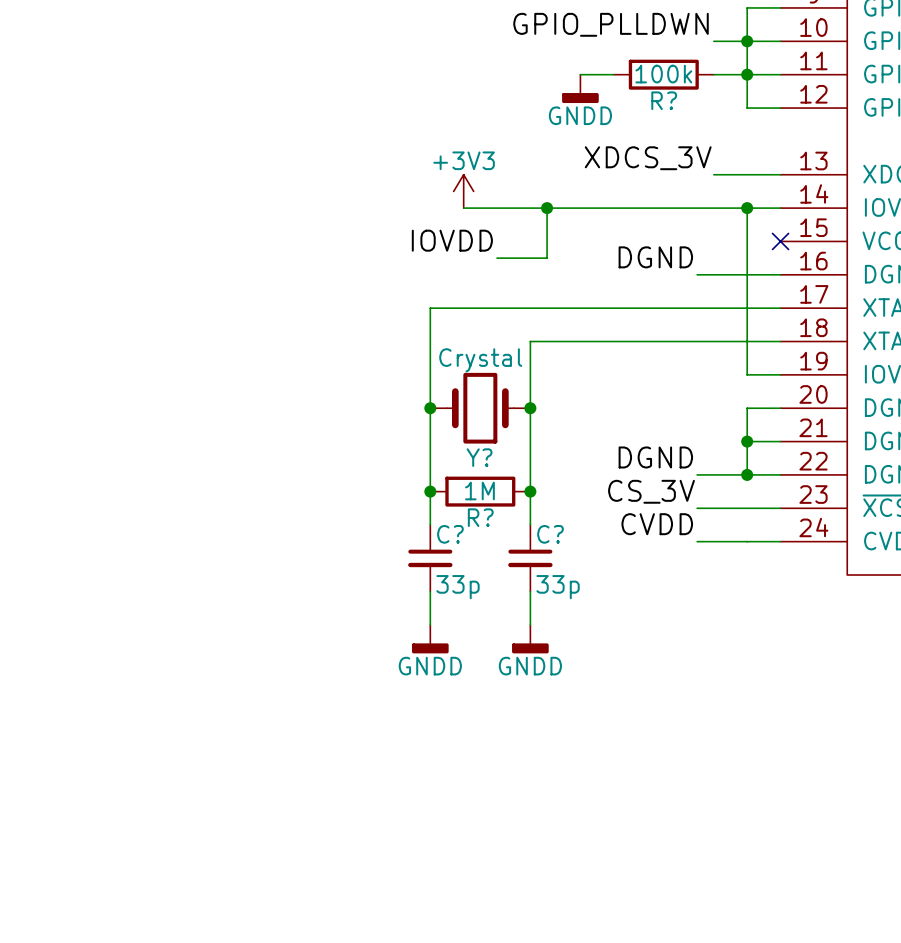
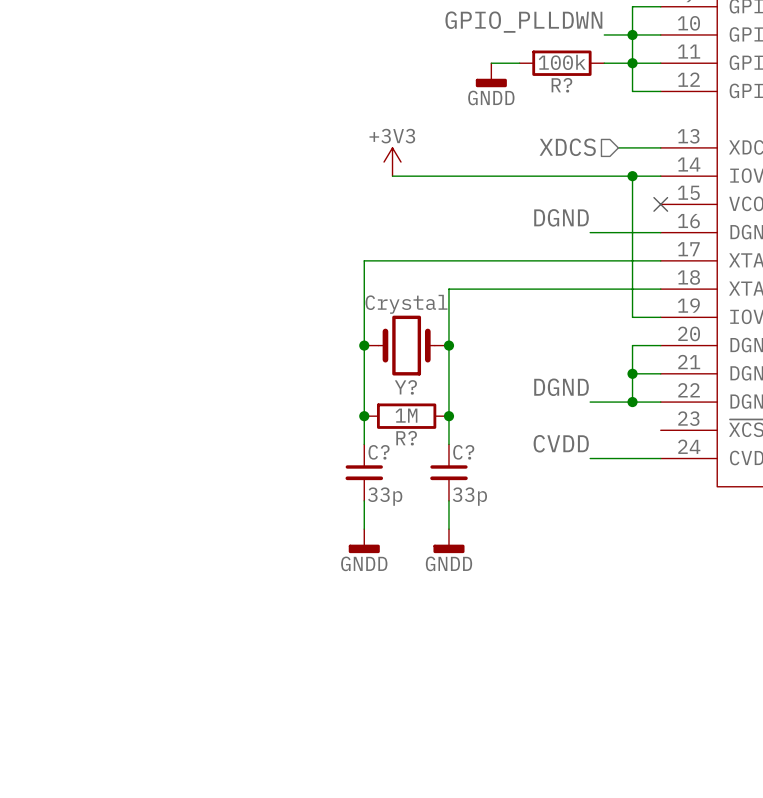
label: XDCS_3V (648, 158) -> none
hierarchical label: none -> XDCS (567, 147)
wire: (713, 174) (730, 174) -> none
wire: (547, 208) (547, 258) (497, 258) -> none
junction: (547, 208) -> none
label: IOVDD (452, 240) -> none
label: CS_3V (651, 491) -> none
wire: (697, 508) (780, 508) -> none

